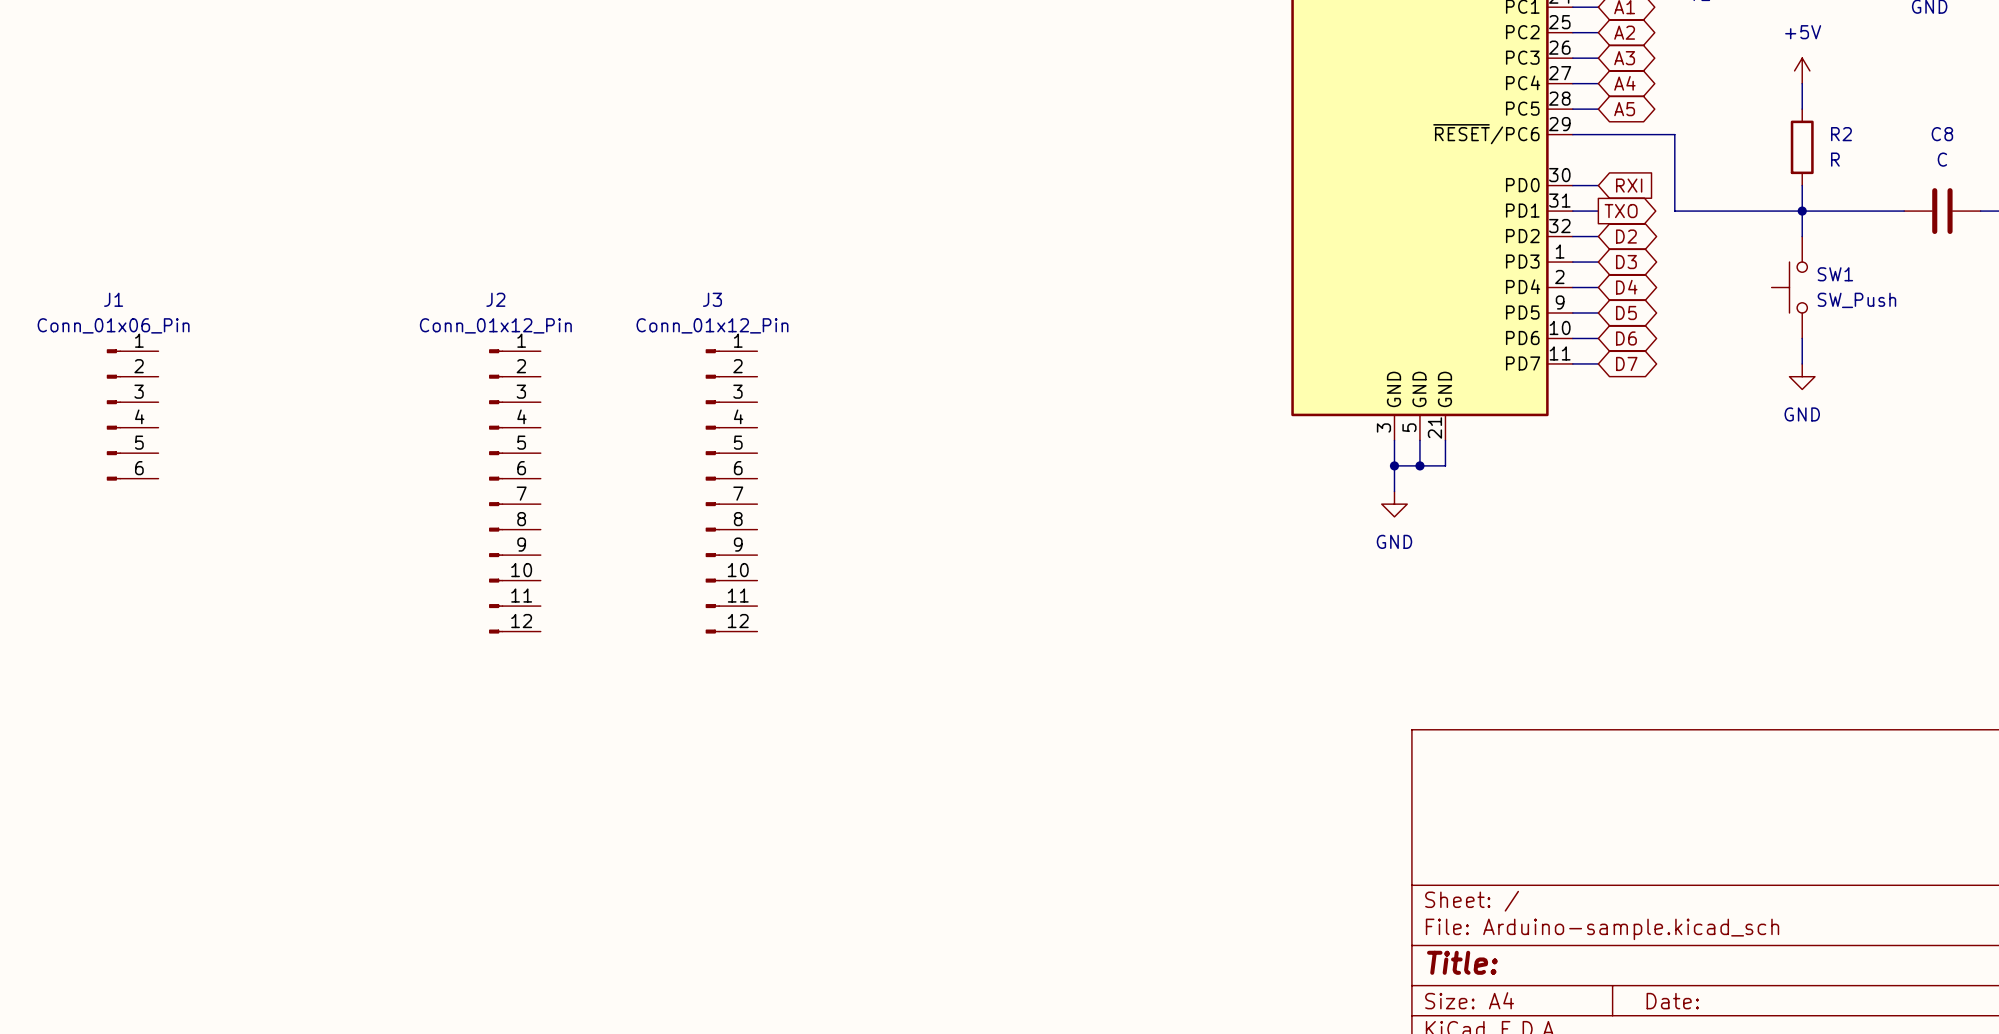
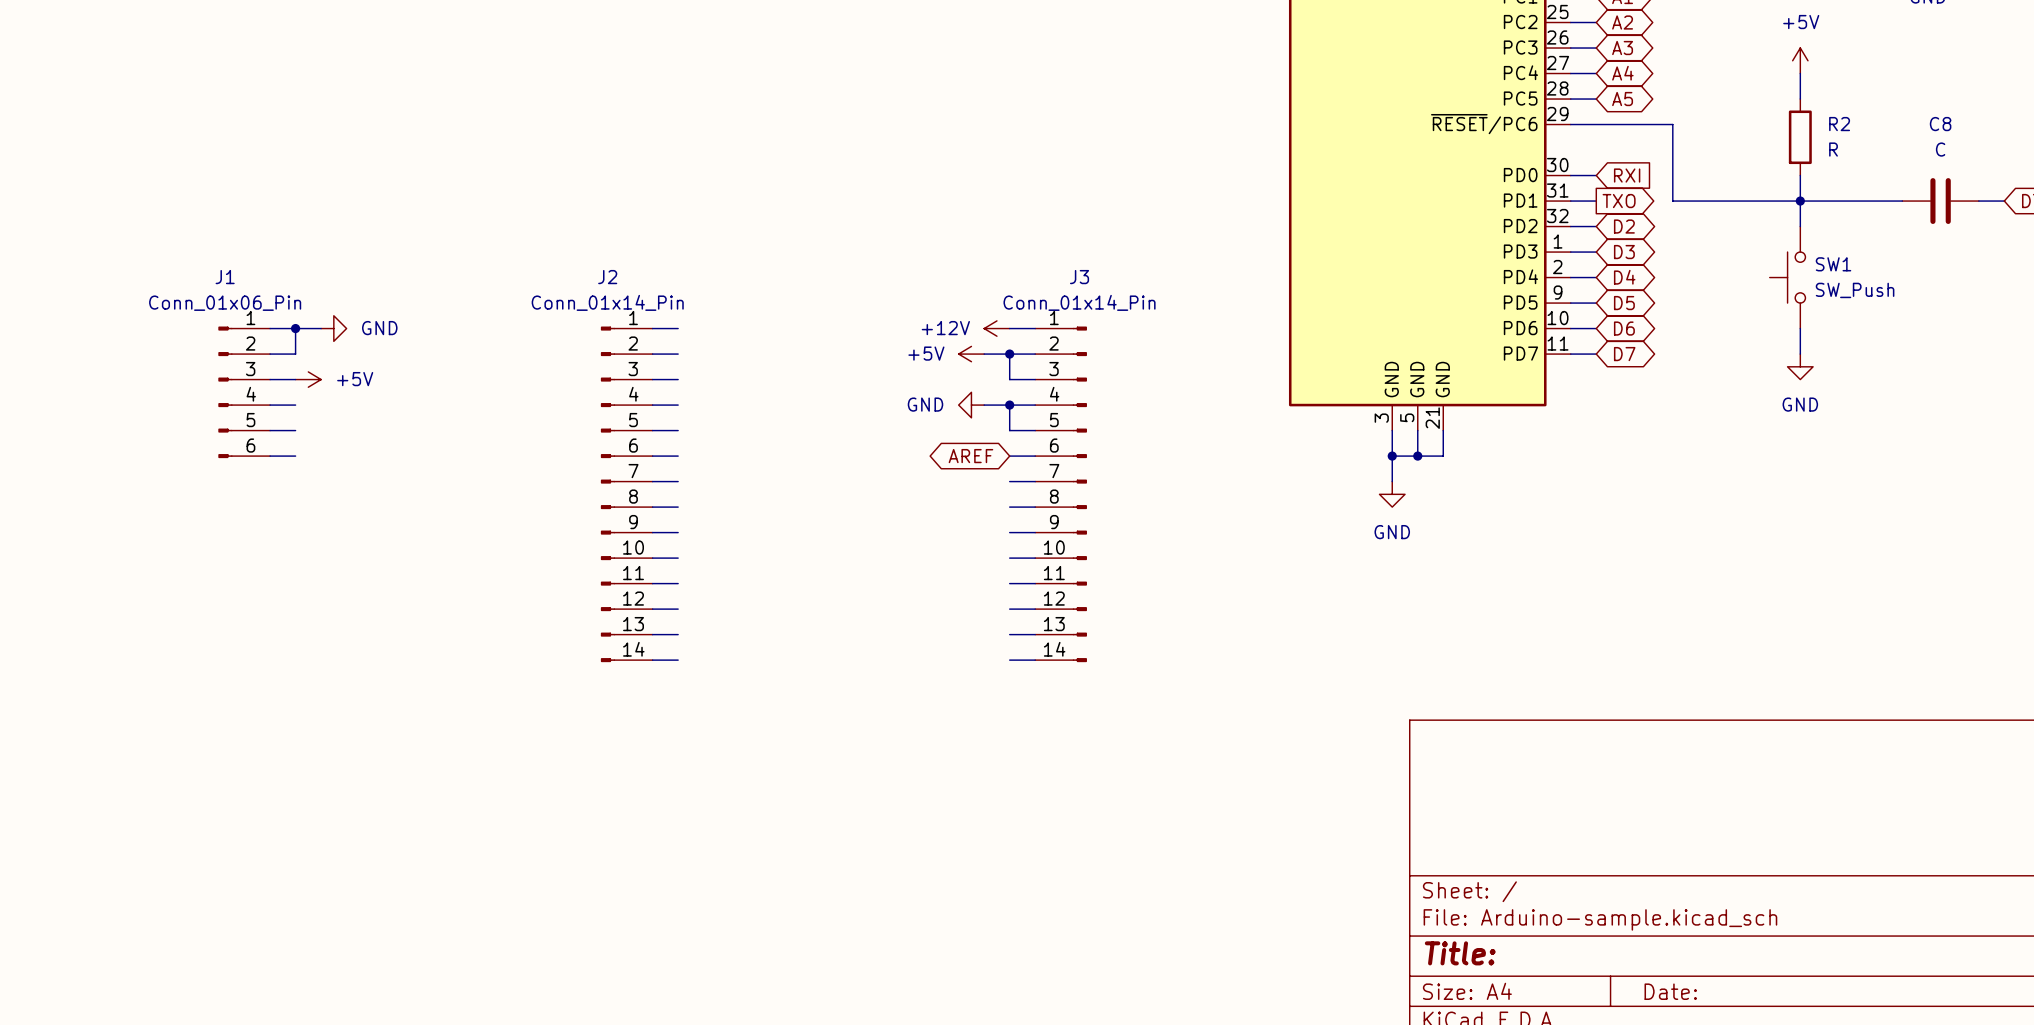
J2 name position: J2 (495, 299) -> J2 (607, 277)
J3 name position: J3 (712, 299) -> J3 (1079, 277)
J2 value: Conn_01x12_Pin (495, 325) -> Conn_01x14_Pin (607, 302)
J3 value: Conn_01x12_Pin (712, 325) -> Conn_01x14_Pin (1079, 302)
wire: none -> (270, 328) (321, 328)
wire: none -> (295, 328) (295, 354) (270, 354)
junction: none -> (295, 328)
power symbol: none -> GND (333, 328)
wire: none -> (652, 328) (678, 328)
power symbol: none -> +12V (996, 328)
wire: none -> (1009, 328) (1035, 328)
J2 symbol: [489, 349, 541, 634] -> [600, 326, 653, 663]
J3 symbol: [705, 349, 758, 634] -> [1035, 326, 1087, 663]
wire: none -> (652, 354) (678, 354)
power symbol: none -> +5V (971, 354)
wire: none -> (984, 354) (1035, 354)
wire: none -> (1009, 354) (1009, 379) (1035, 379)
junction: none -> (1009, 354)
wire: none -> (270, 379) (295, 379)
power symbol: none -> +5V (308, 379)
wire: none -> (652, 379) (678, 379)
J1 position: (132, 414) -> (244, 392)
wire: none -> (270, 405) (295, 405)
wire: none -> (652, 405) (678, 405)
power symbol: none -> GND (971, 405)
wire: none -> (984, 405) (1035, 405)
wire: none -> (1009, 405) (1009, 430) (1035, 430)
junction: none -> (1009, 405)
wire: none -> (270, 430) (295, 430)
wire: none -> (652, 430) (678, 430)
wire: none -> (270, 456) (295, 456)
wire: none -> (652, 456) (678, 456)
global label: none -> AREF (970, 456)
wire: none -> (1009, 456) (1035, 456)
wire: none -> (652, 481) (678, 481)
wire: none -> (1009, 481) (1035, 481)
wire: none -> (652, 507) (678, 507)
wire: none -> (1009, 507) (1035, 507)
wire: none -> (652, 532) (678, 532)
wire: none -> (1009, 532) (1035, 532)
wire: none -> (652, 558) (678, 558)
wire: none -> (1009, 558) (1035, 558)
wire: none -> (652, 583) (678, 583)
wire: none -> (1009, 583) (1035, 583)
wire: none -> (652, 609) (678, 609)
wire: none -> (1009, 609) (1035, 609)
wire: none -> (652, 634) (678, 634)
wire: none -> (1009, 634) (1035, 634)
wire: none -> (652, 660) (678, 660)
wire: none -> (1009, 660) (1035, 660)

